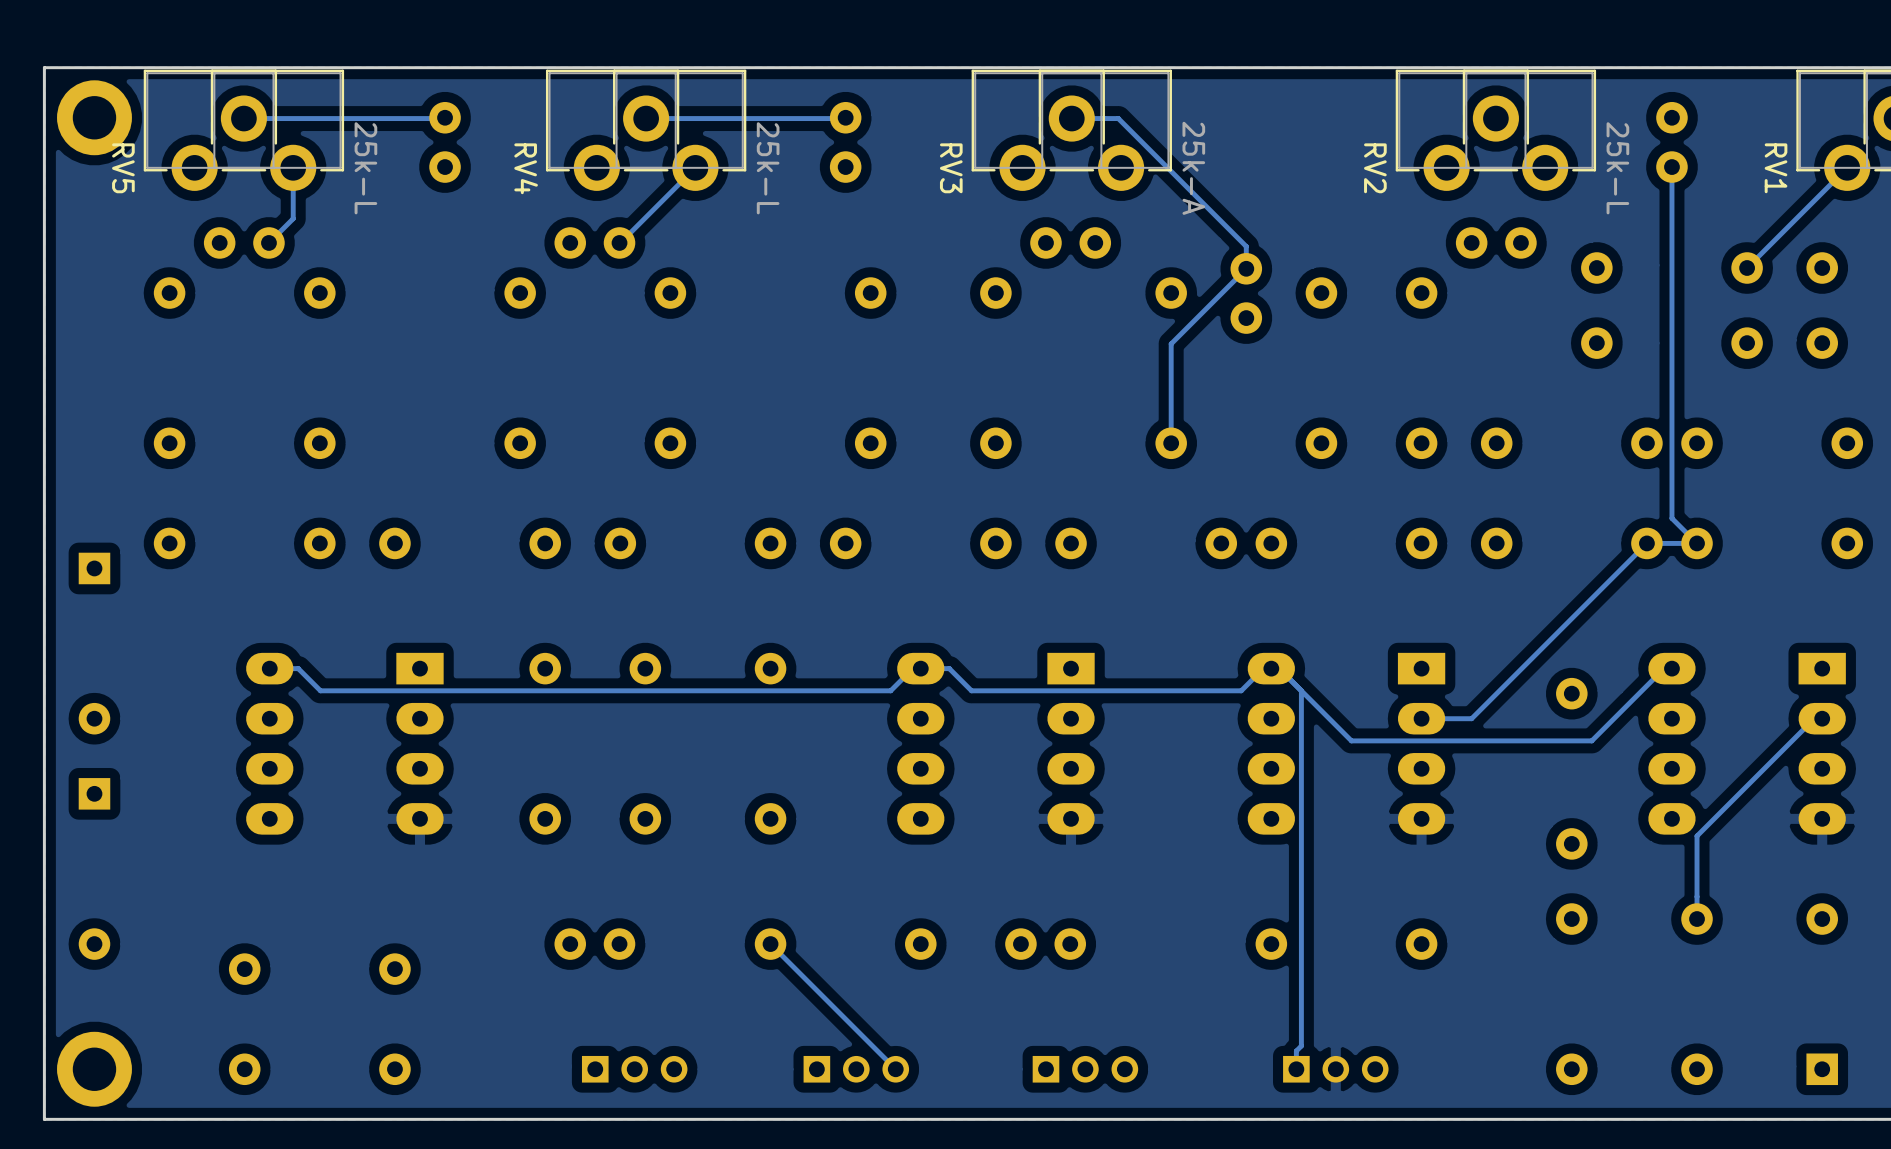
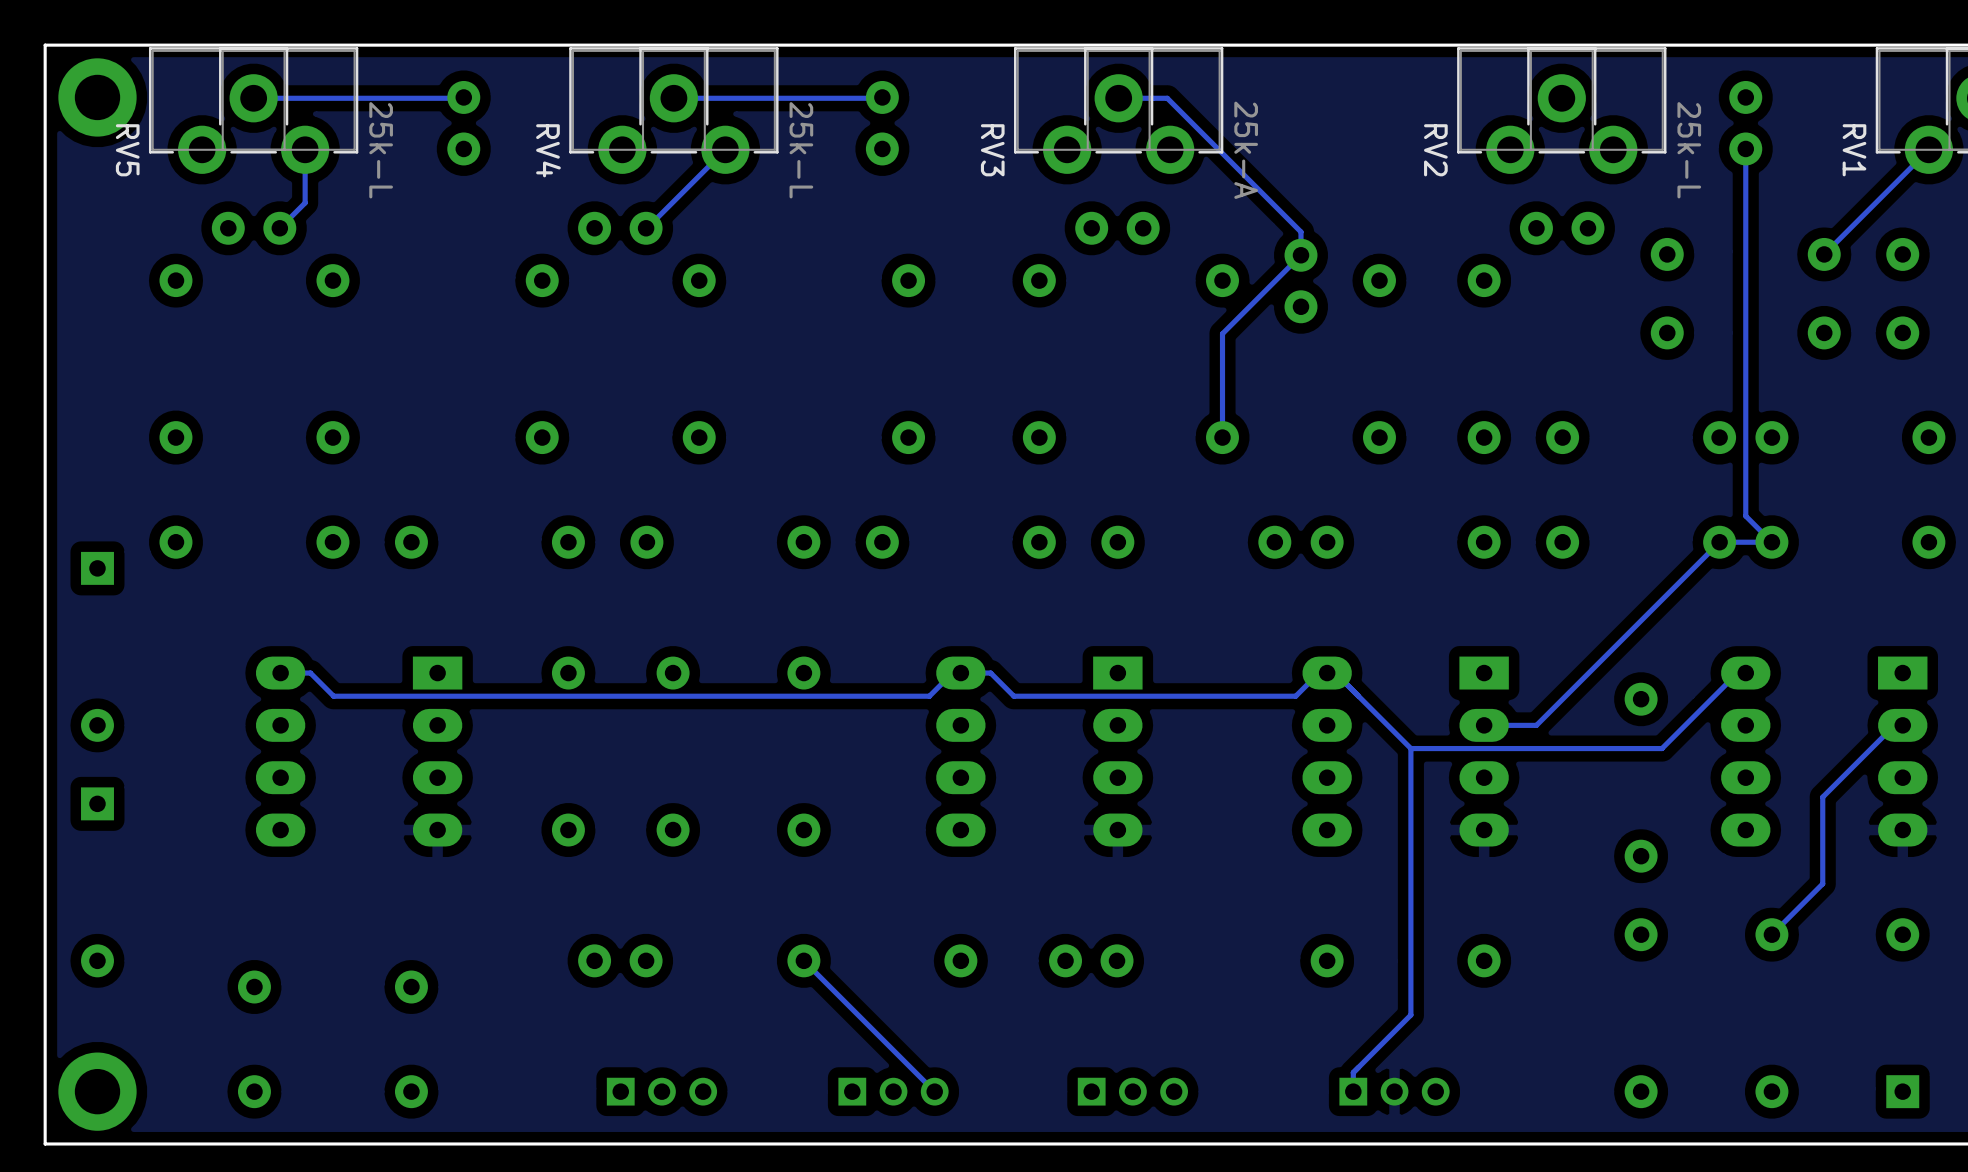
track: (1301, 690) (1301, 1046) -> (1410, 748) (1410, 1015) (1358, 1067)
track: (1745, 787) (1697, 836) (1697, 919) -> (1822, 797) (1822, 883) (1771, 934)

